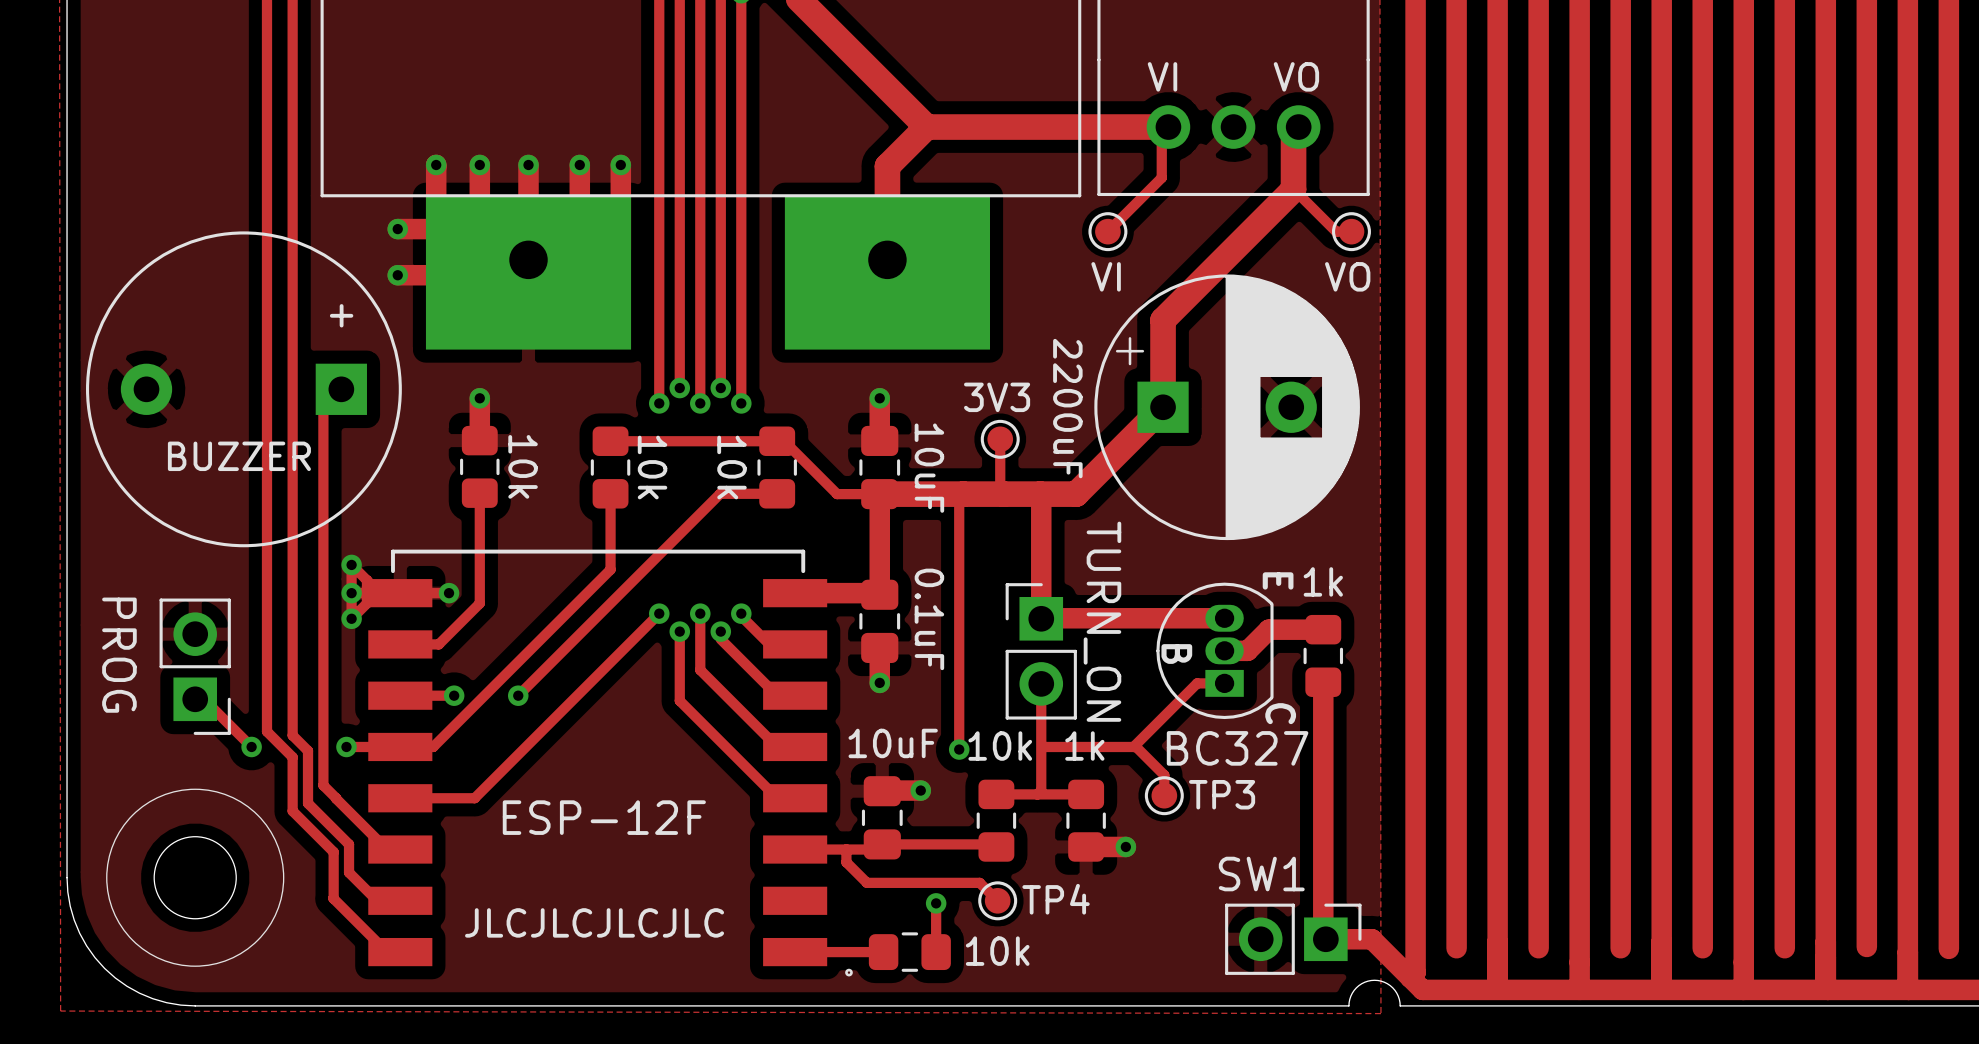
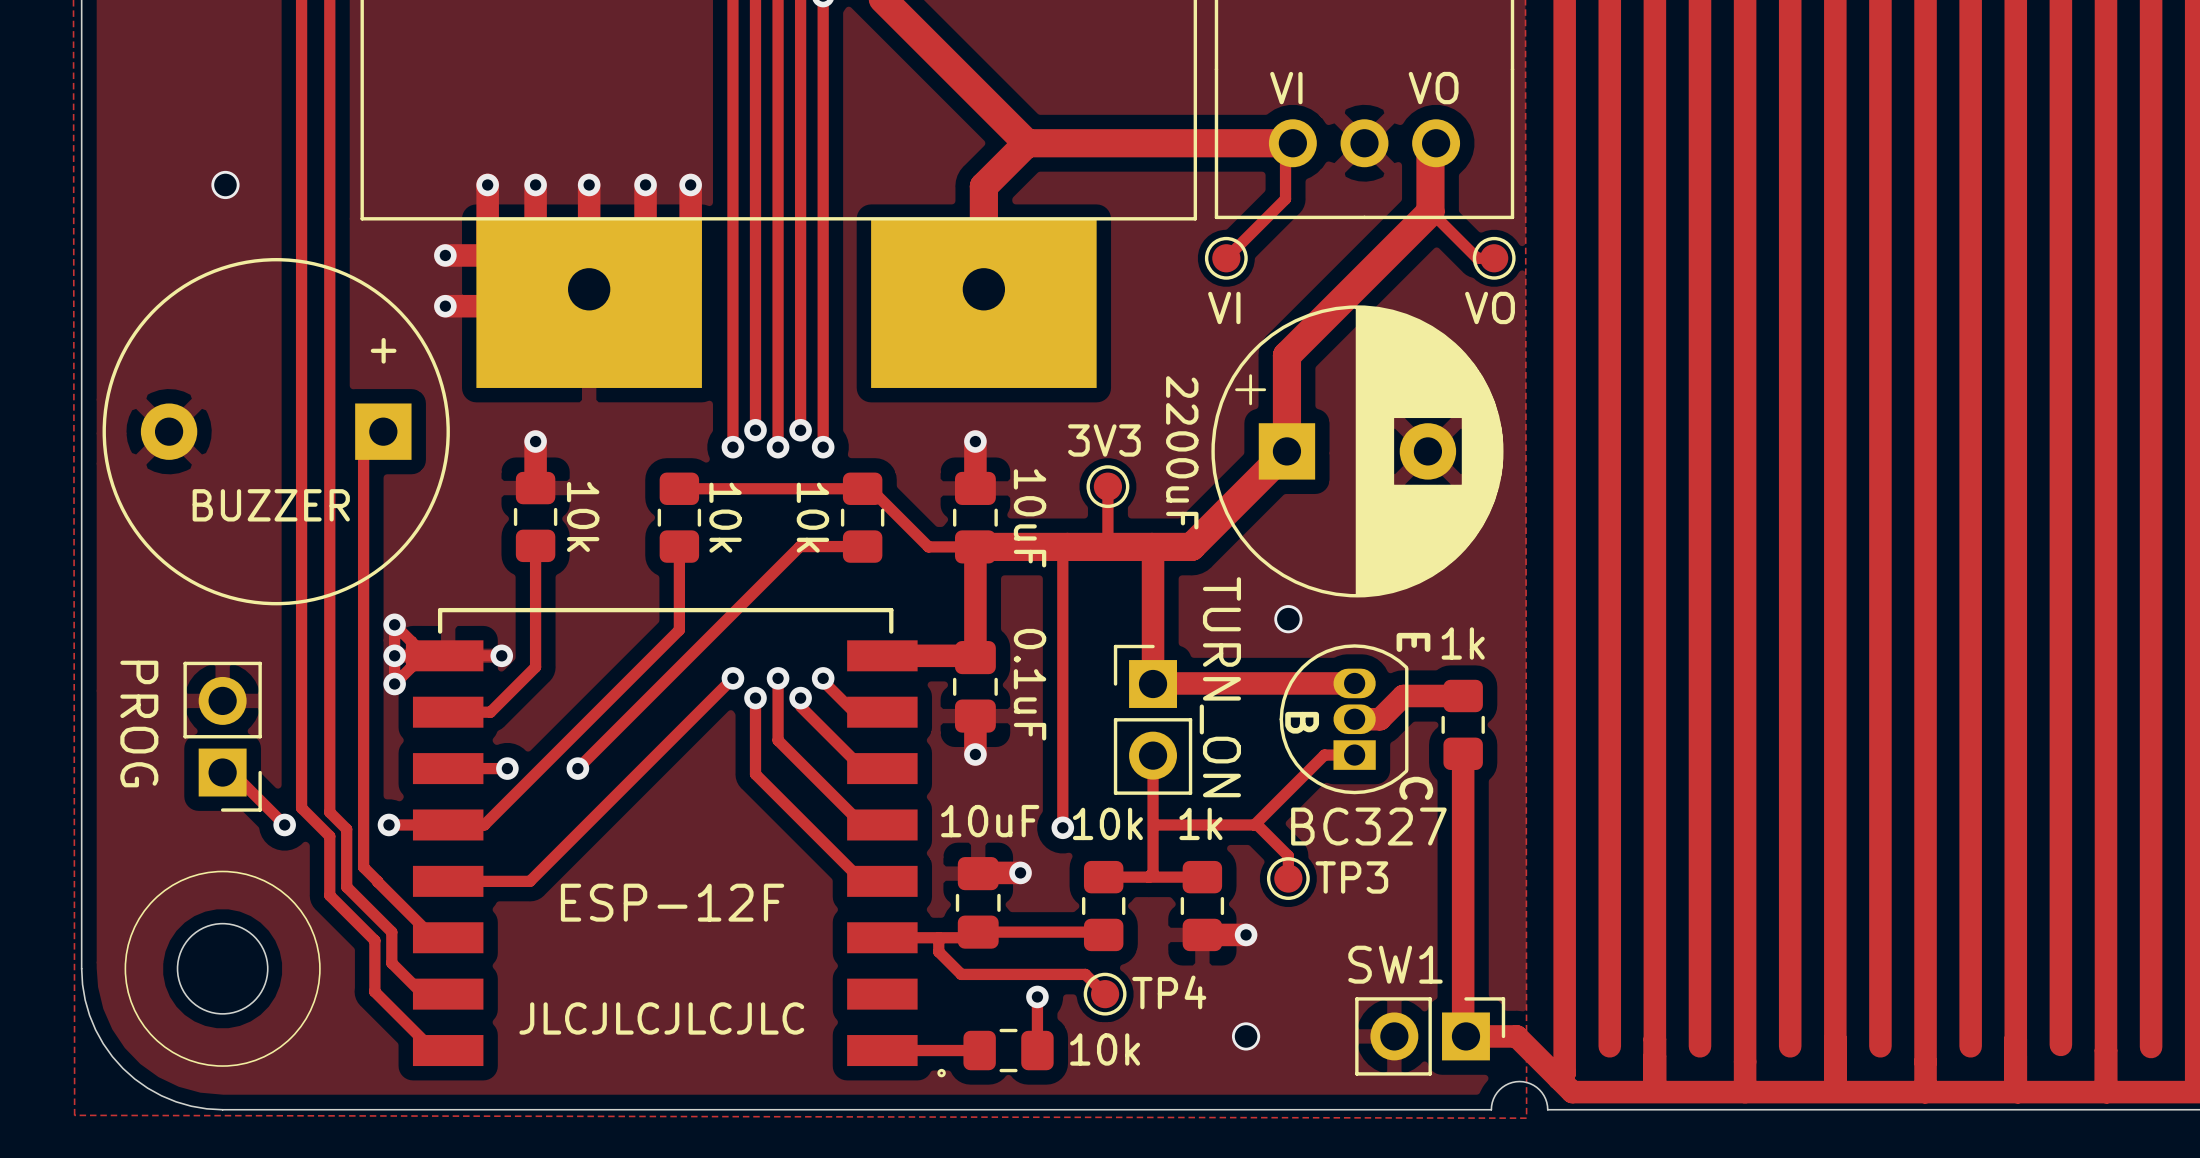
via: none -> (225, 184)
via: none -> (1288, 619)
via: none -> (1246, 1036)

